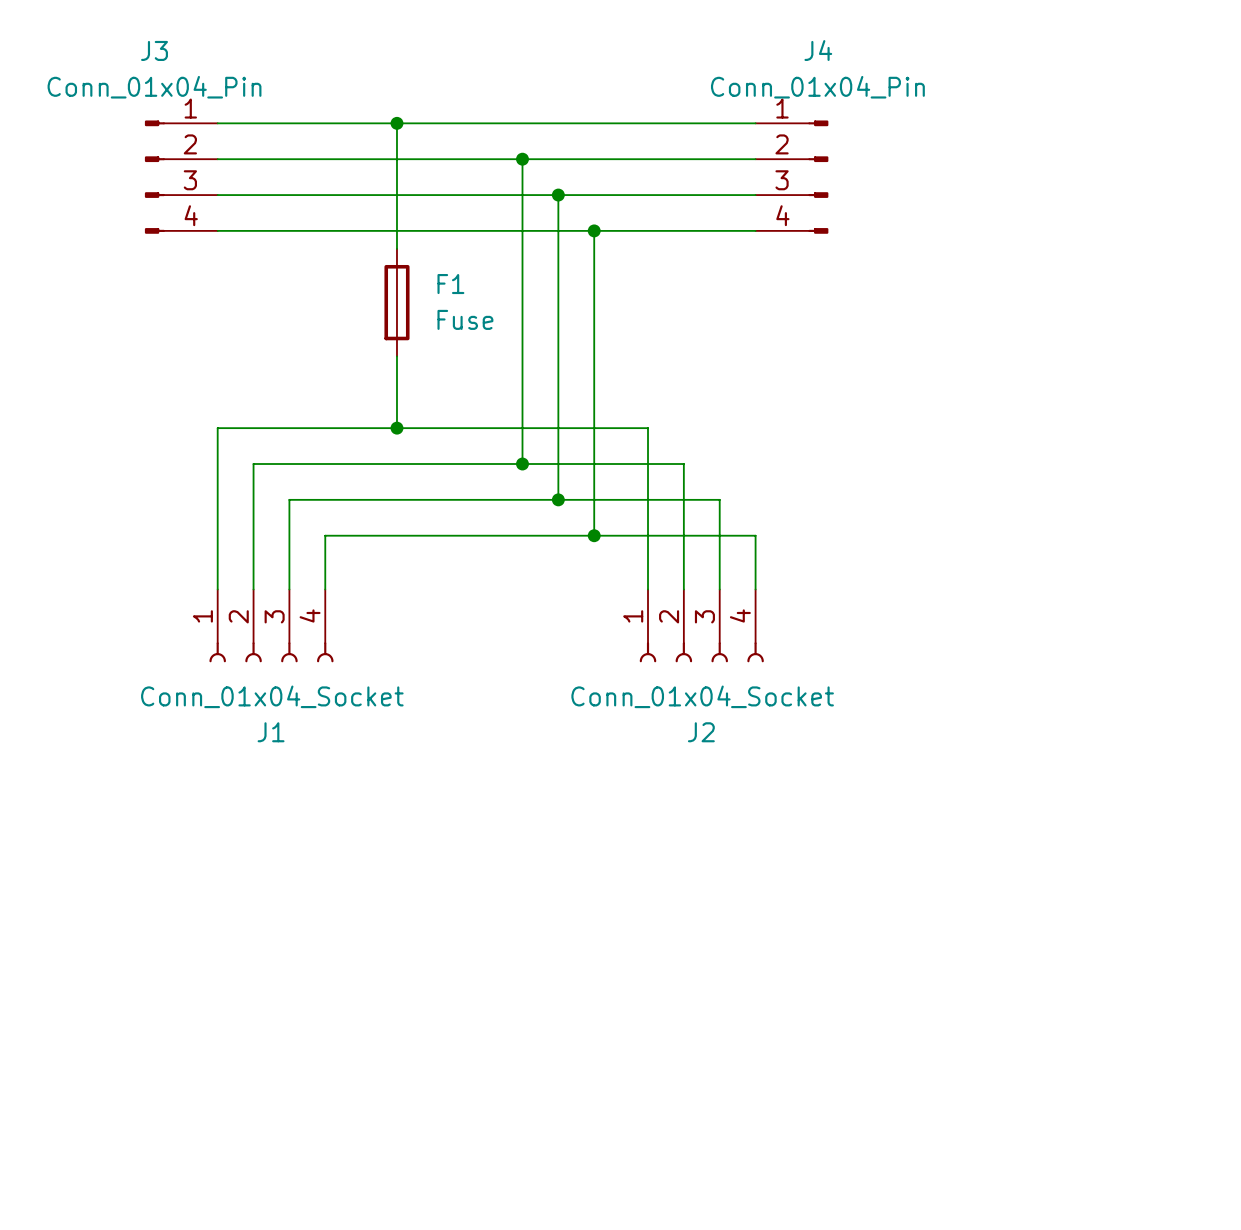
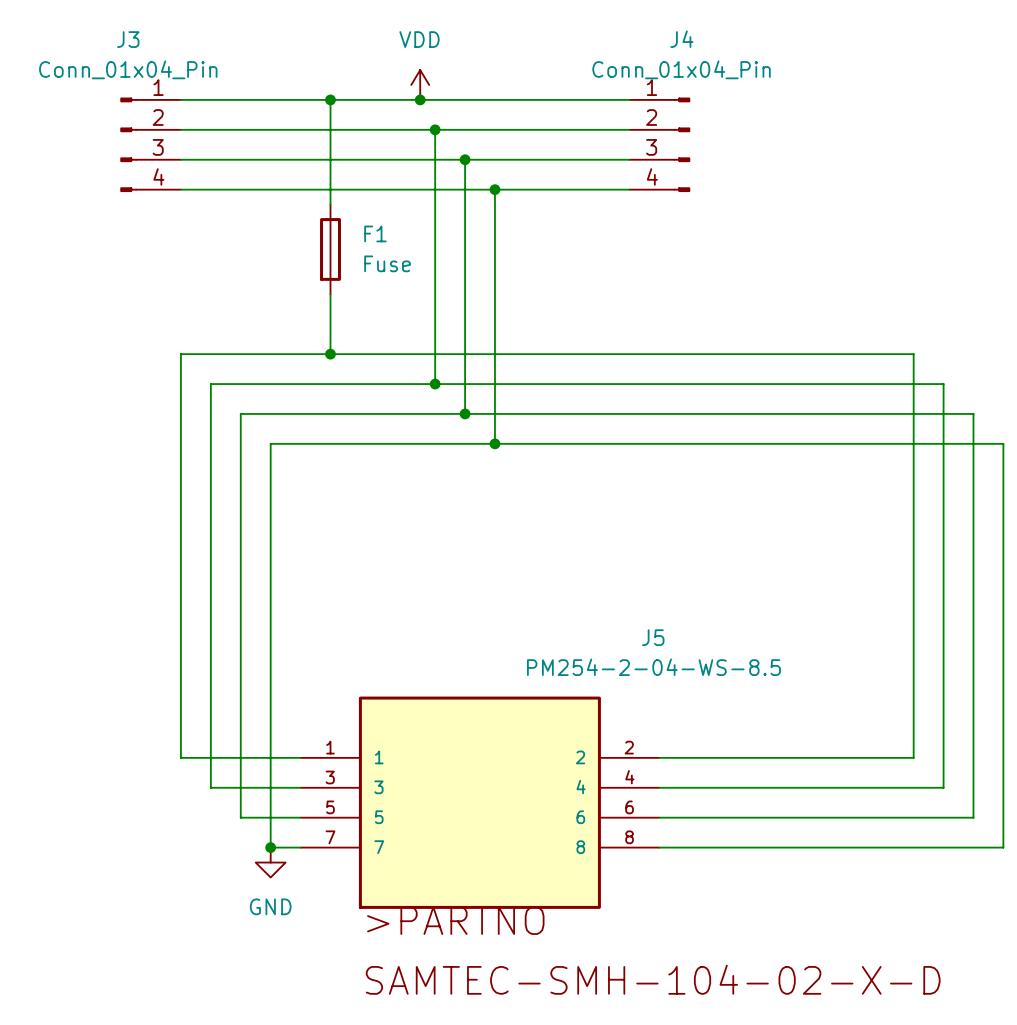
power symbol: none -> VDD (420, 84)
junction: none -> (420, 99)
wire: (648, 428) (648, 589) -> (539, 354) (913, 354) (913, 757) (659, 757)
wire: (683, 464) (683, 589) -> (569, 384) (943, 384) (943, 787) (659, 787)
wire: (719, 499) (719, 589) -> (599, 413) (973, 413) (973, 817) (659, 817)
wire: (755, 535) (755, 589) -> (629, 443) (1003, 443) (1003, 847) (659, 847)
wire: none -> (180, 488) (180, 757) (300, 757)
wire: none -> (210, 488) (210, 787) (300, 787)
wire: none -> (240, 488) (240, 817) (300, 817)
wire: none -> (270, 488) (270, 847) (300, 847)
J1: Conn_01x04_Socket (271, 625) -> none
J2: Conn_01x04_Socket (701, 625) -> none
J5: none -> PM254-2-04-WS-8.5 (480, 802)
junction: none -> (270, 847)
power symbol: none -> GND (270, 862)

